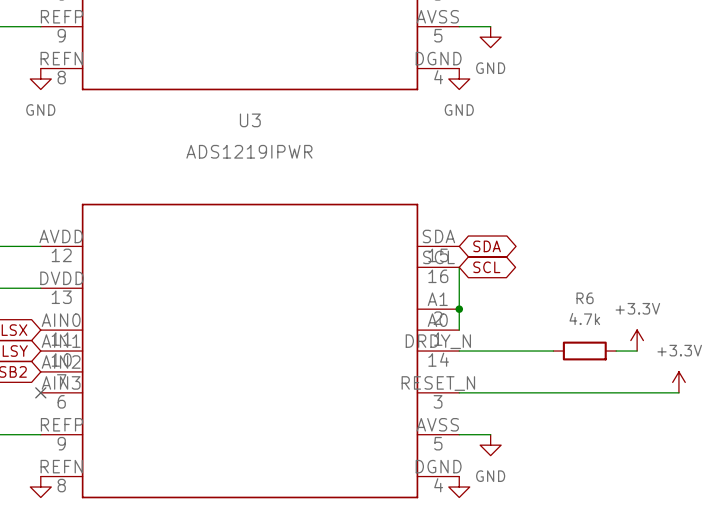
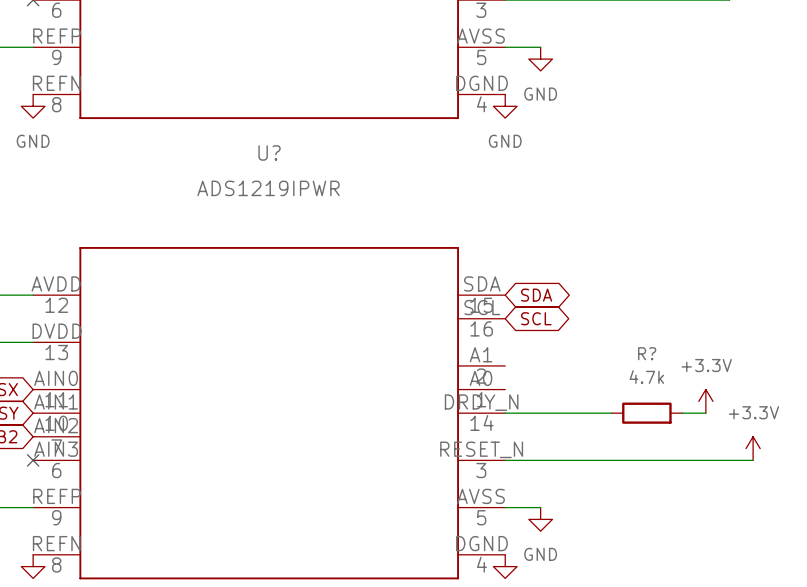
U3 name: U3 (250, 120) -> U? (269, 152)
wire: (459, 267) (459, 330) -> none
R6 name: R6 (585, 298) -> R? (647, 353)
junction: (459, 309) -> none

